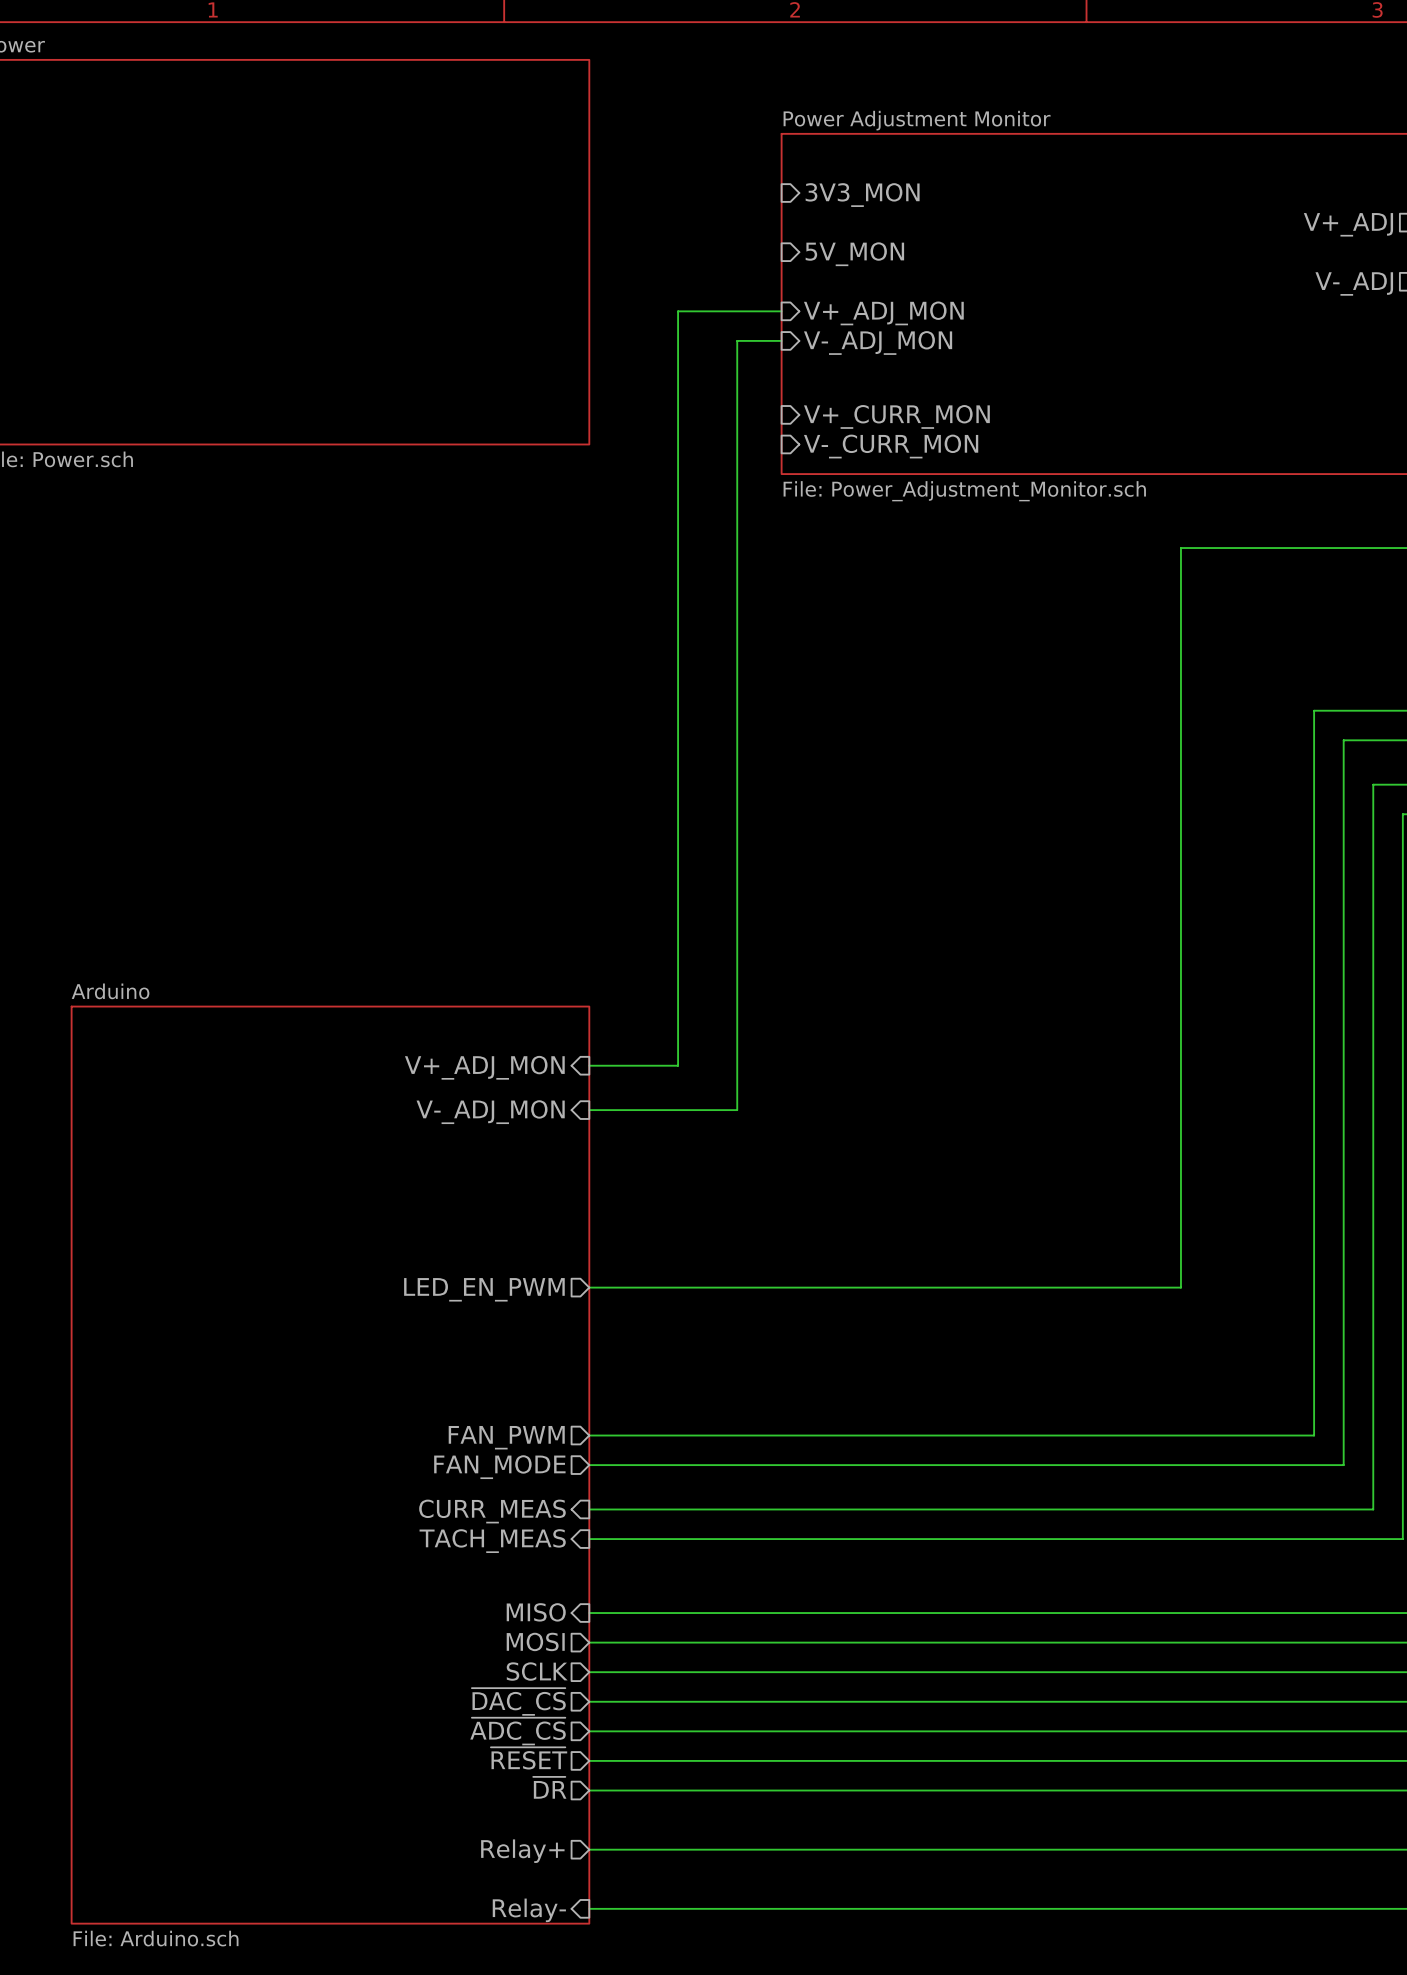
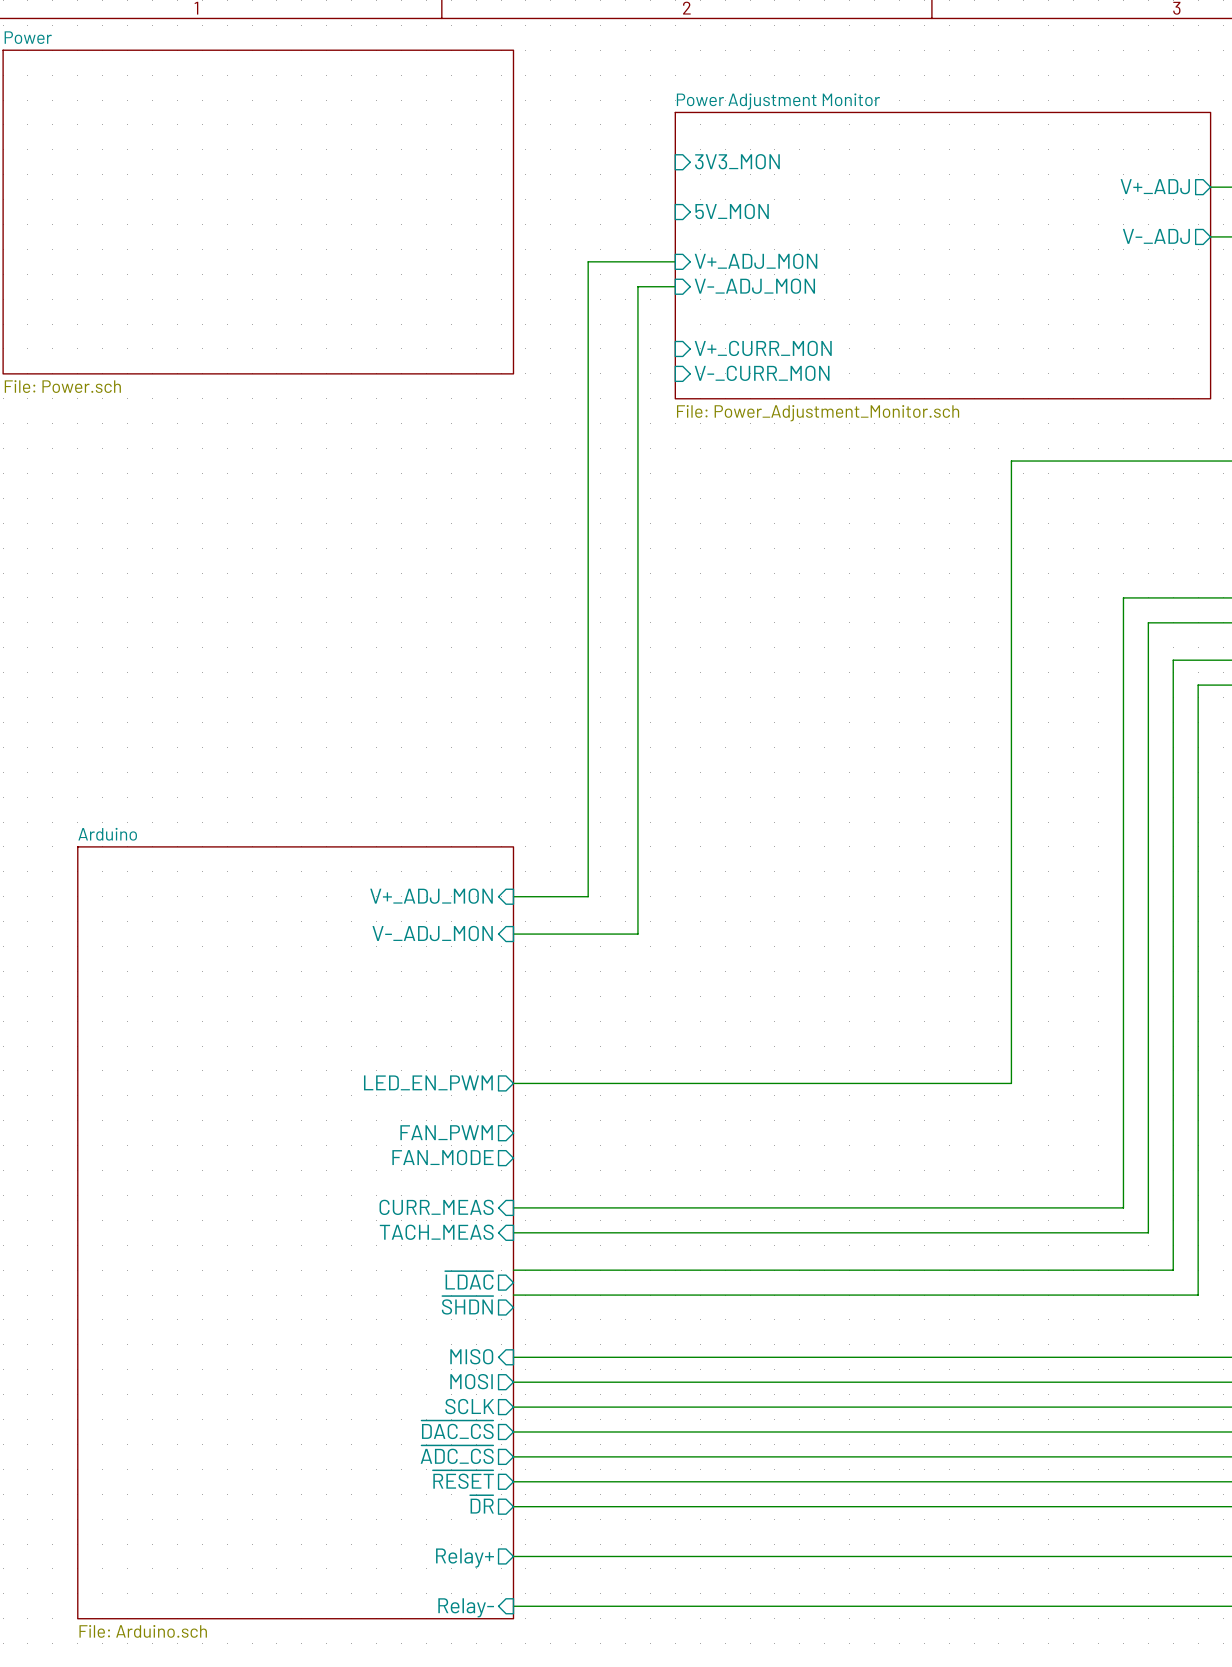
sheet pin: none -> FAN_PWM (446, 1132)
sheet pin: none -> FAN_MODE (442, 1157)
sheet pin shape: output (506, 1437) -> input (436, 1207)
sheet pin: FAN_PWM (506, 1437) -> CURR_MEAS (436, 1207)
sheet pin shape: output (499, 1467) -> input (436, 1232)
sheet pin: FAN_MODE (499, 1467) -> TACH_MEAS (436, 1232)
sheet pin: CURR_MEAS (492, 1511) -> none
sheet pin: none -> ~{LDAC} (469, 1280)
sheet pin: TACH_MEAS (492, 1541) -> none
sheet pin: none -> ~{SHDN} (467, 1305)

